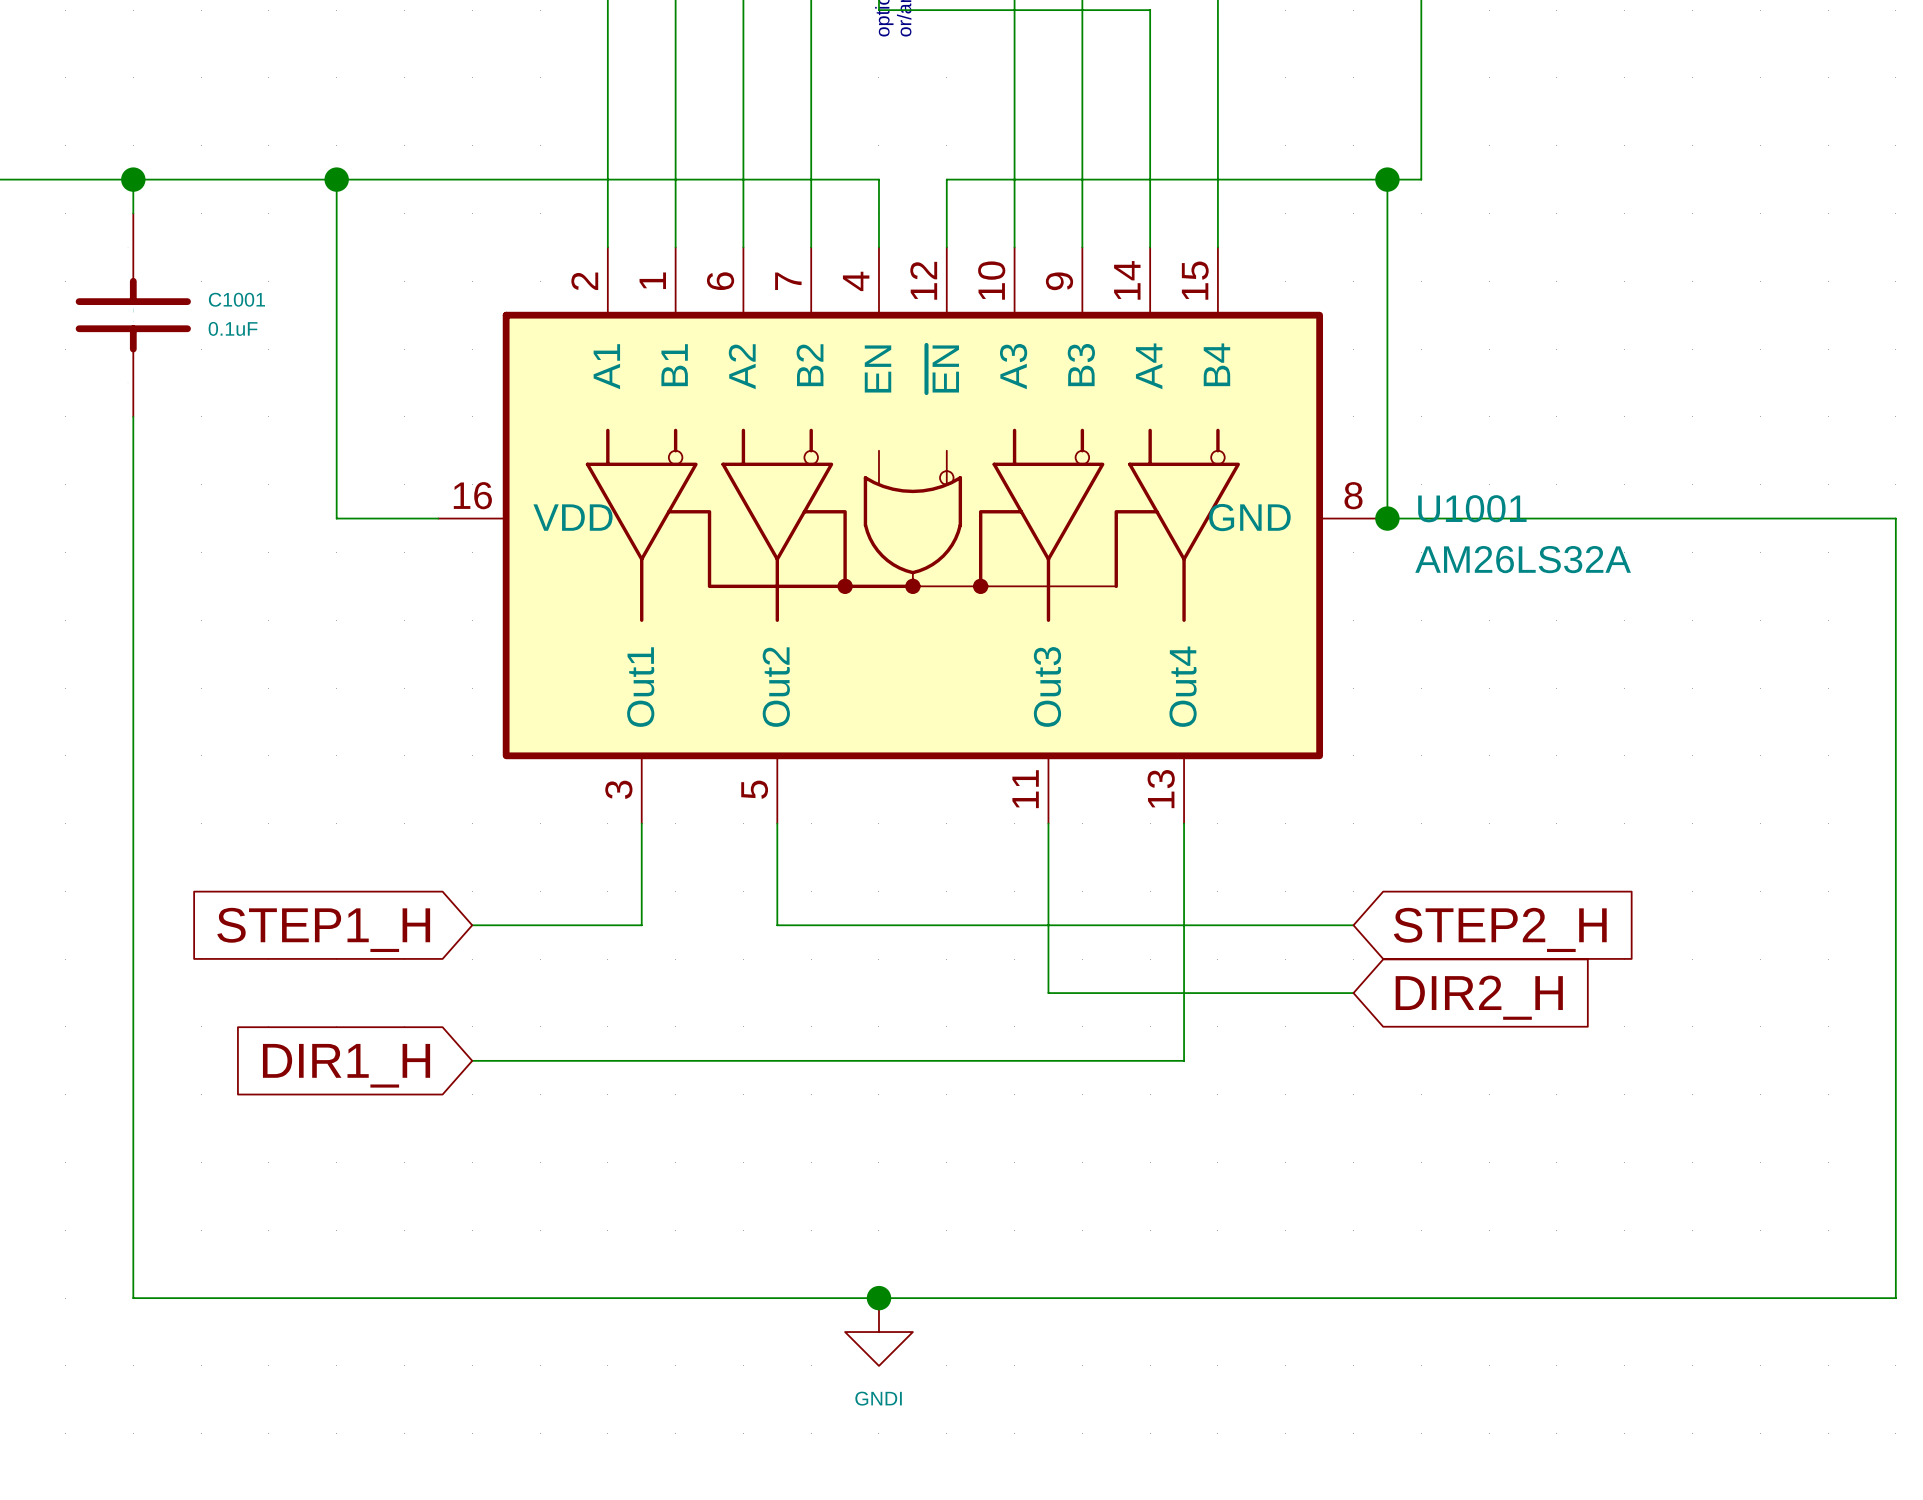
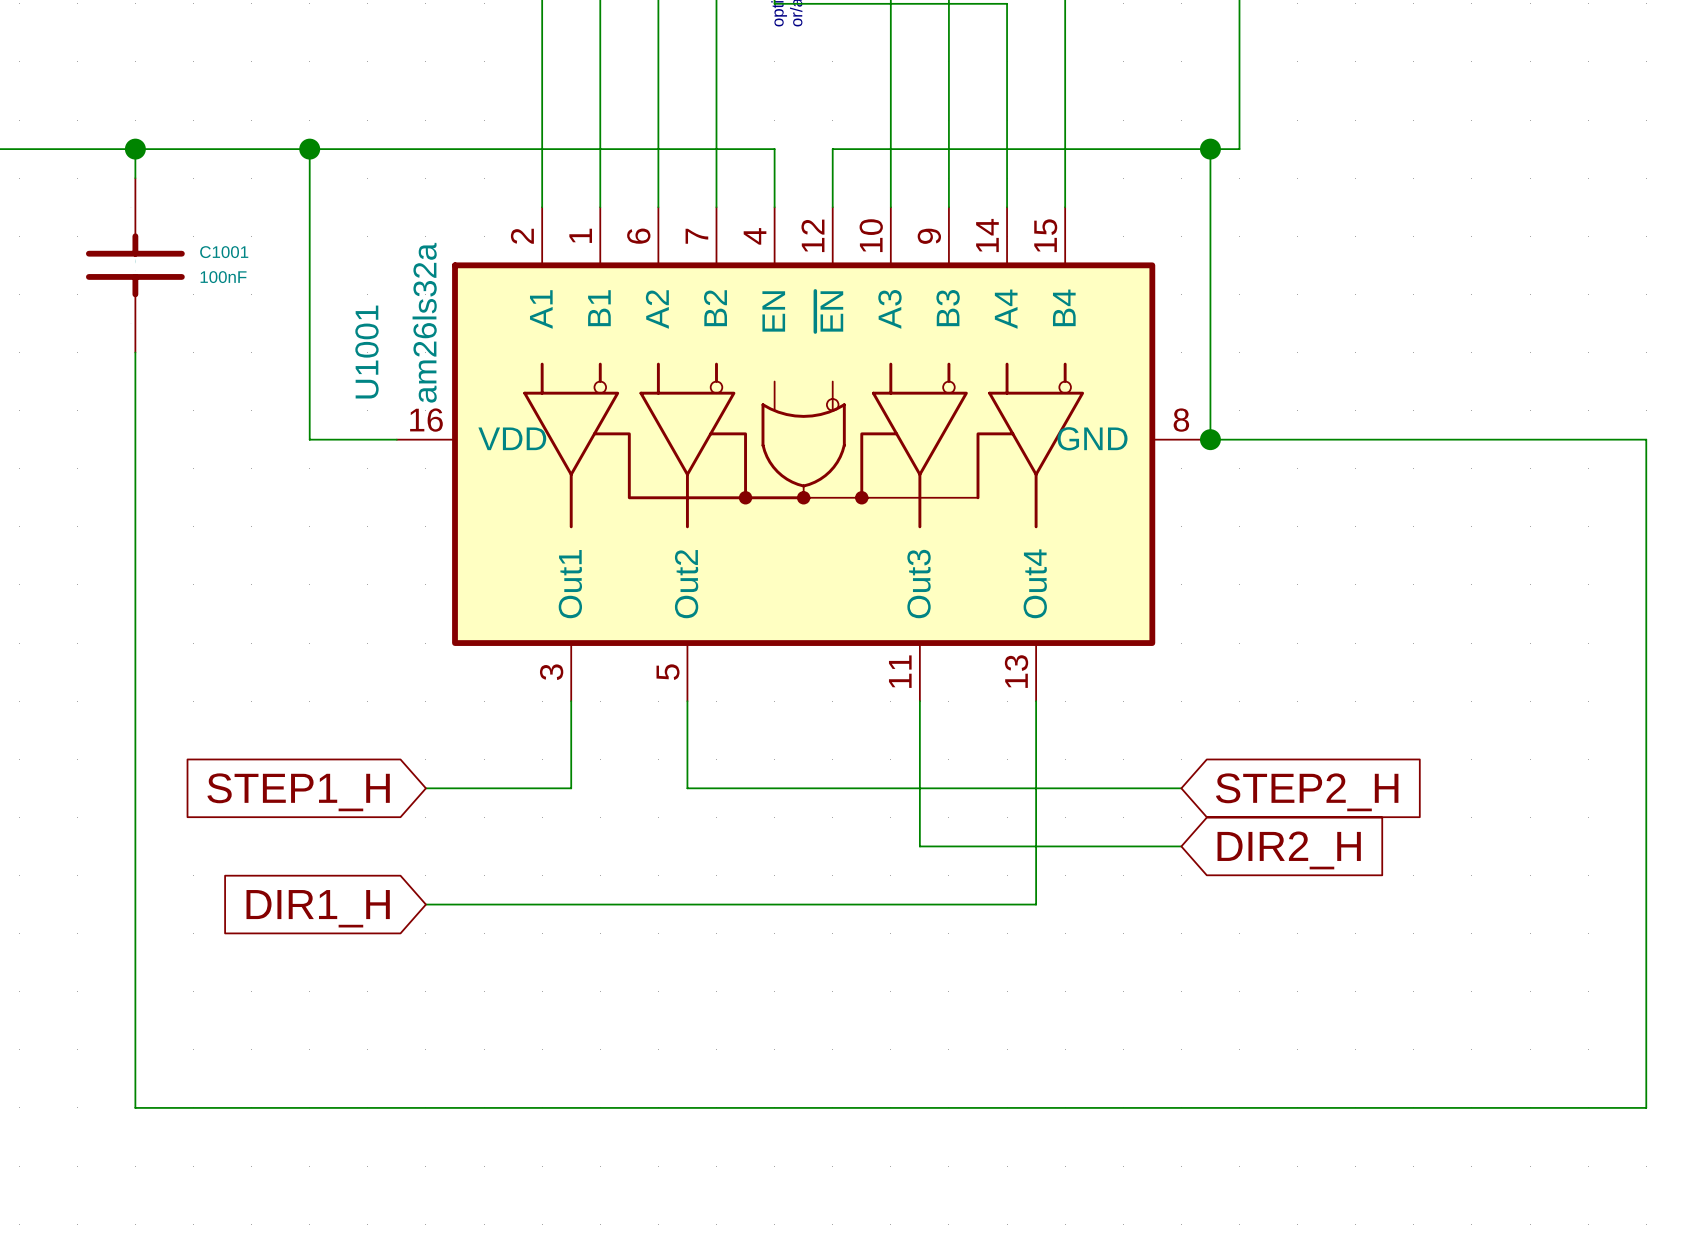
C1001 value: 0.1uF (233, 328) -> 100nF (223, 277)
U1001 name rotation: 0° (1472, 508) -> 90° counterclockwise (366, 352)
U1001 name position: U1001 (1472, 508) -> U1001 (366, 352)
U1001 value: AM26LS32A (1523, 559) -> am26ls32a (424, 322)
junction: (878, 1298) -> none
power symbol: GNDI (878, 1332) -> none

